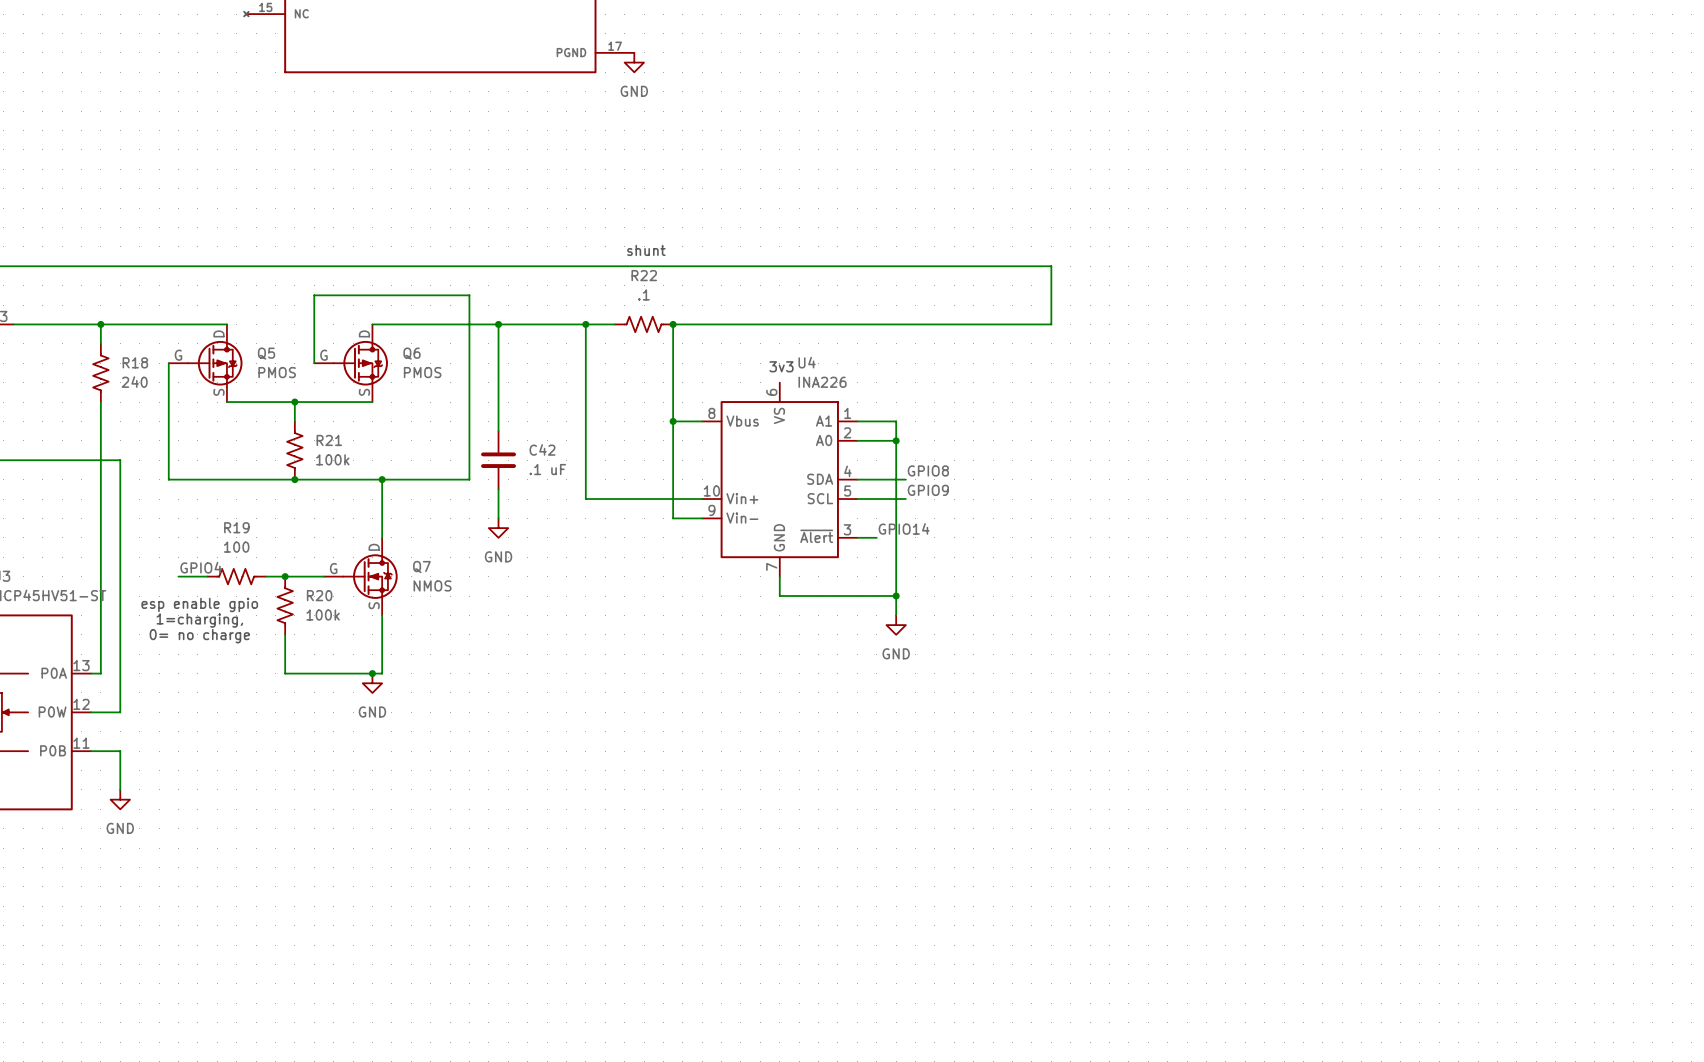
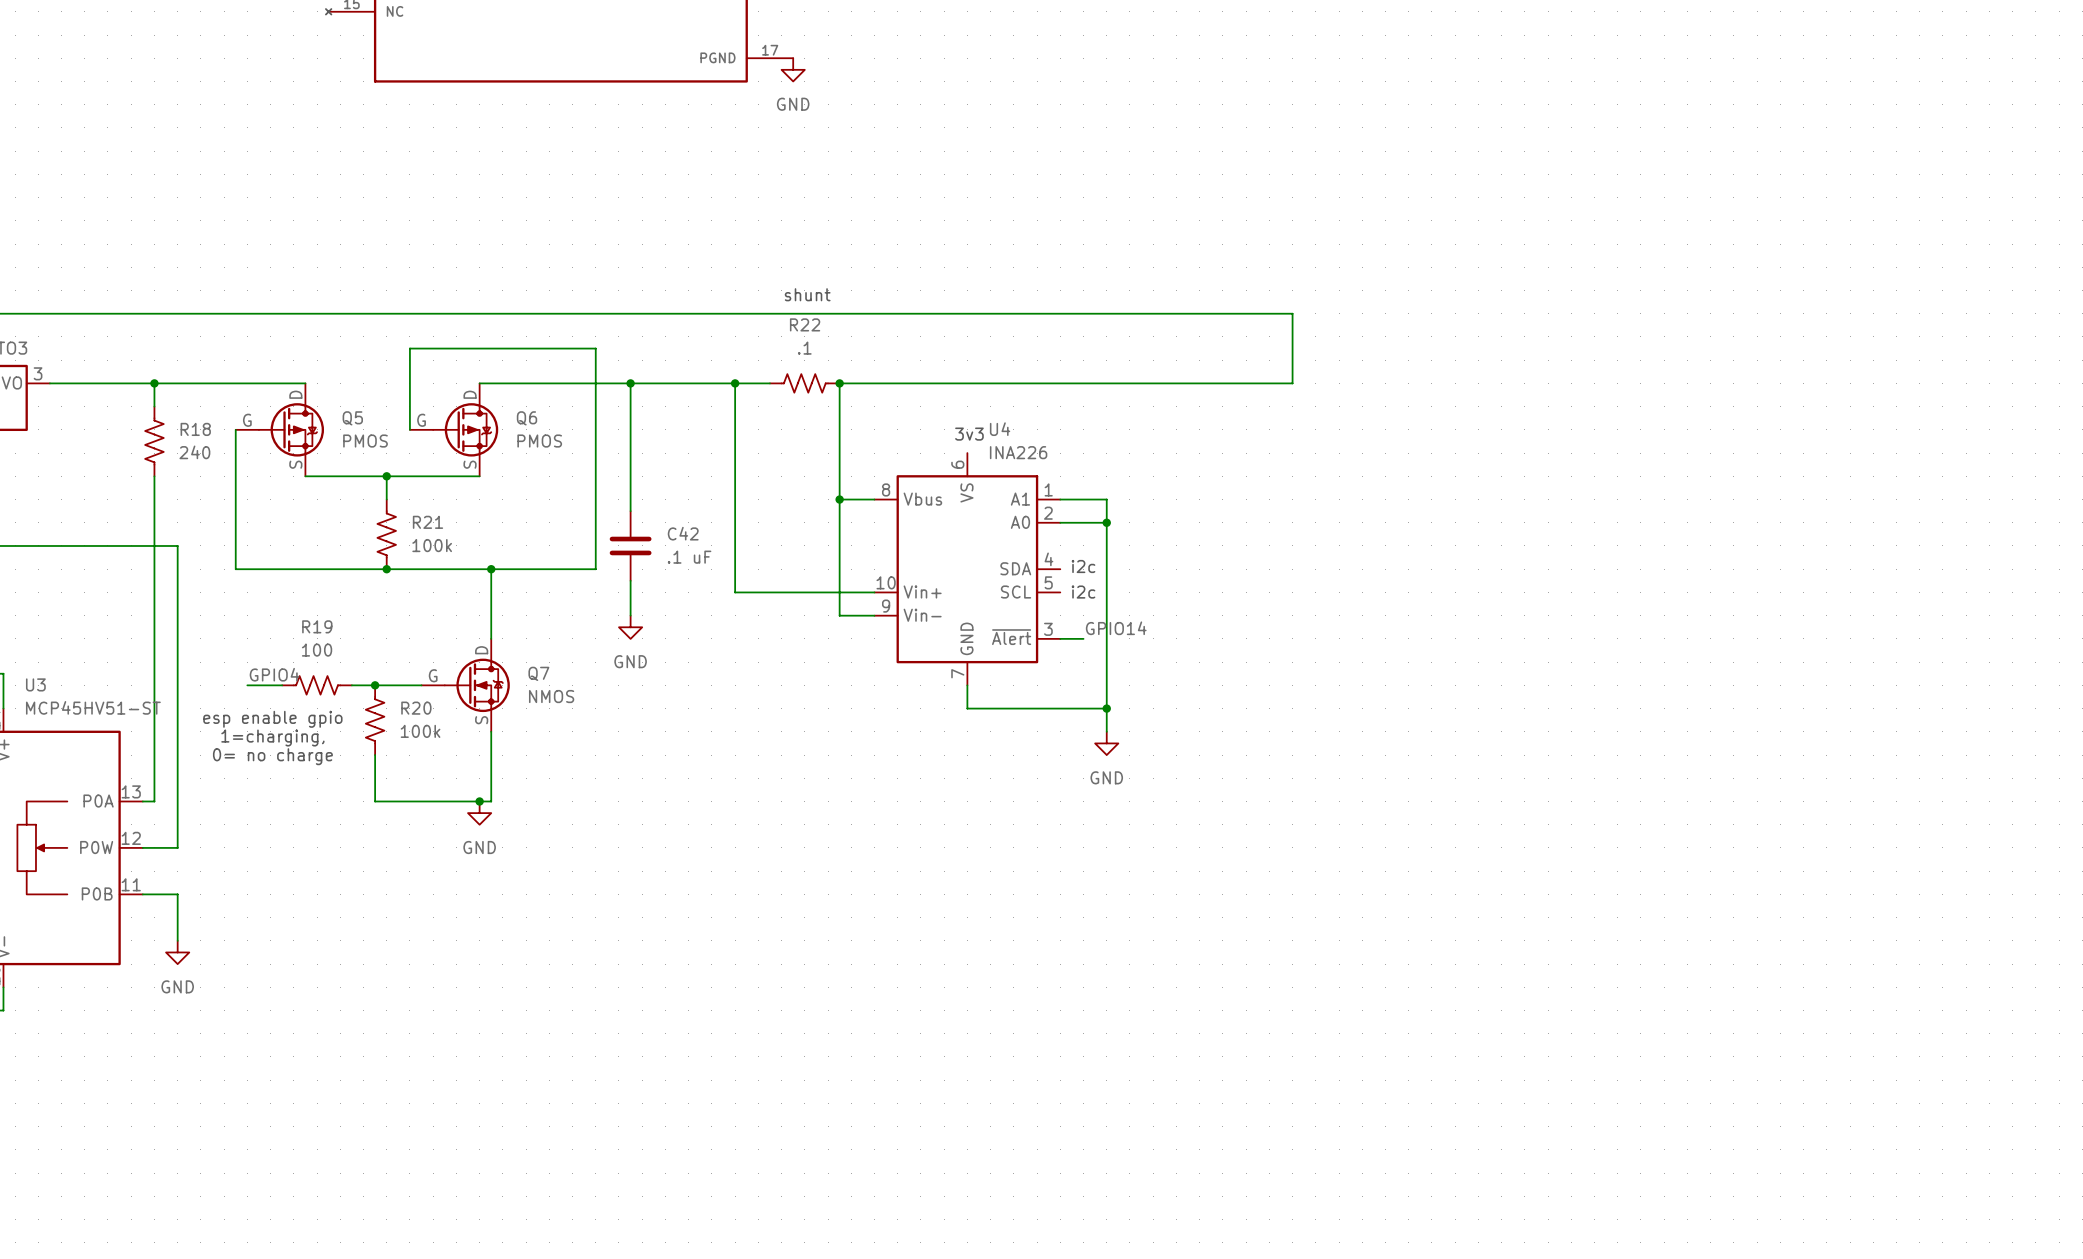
label: GPIO8 (928, 470) -> none
text: none -> i2c (1083, 566)
wire: (857, 479) (905, 479) -> none
label: GPIO9 (928, 490) -> none
text: none -> i2c (1083, 592)
wire: (857, 499) (905, 499) -> none

